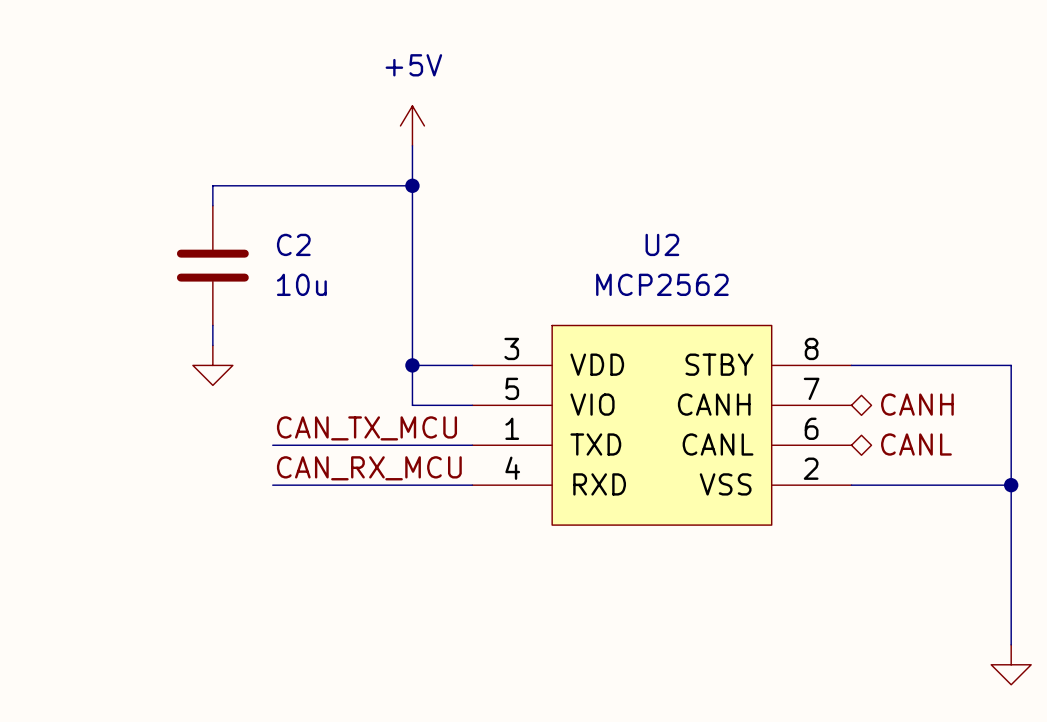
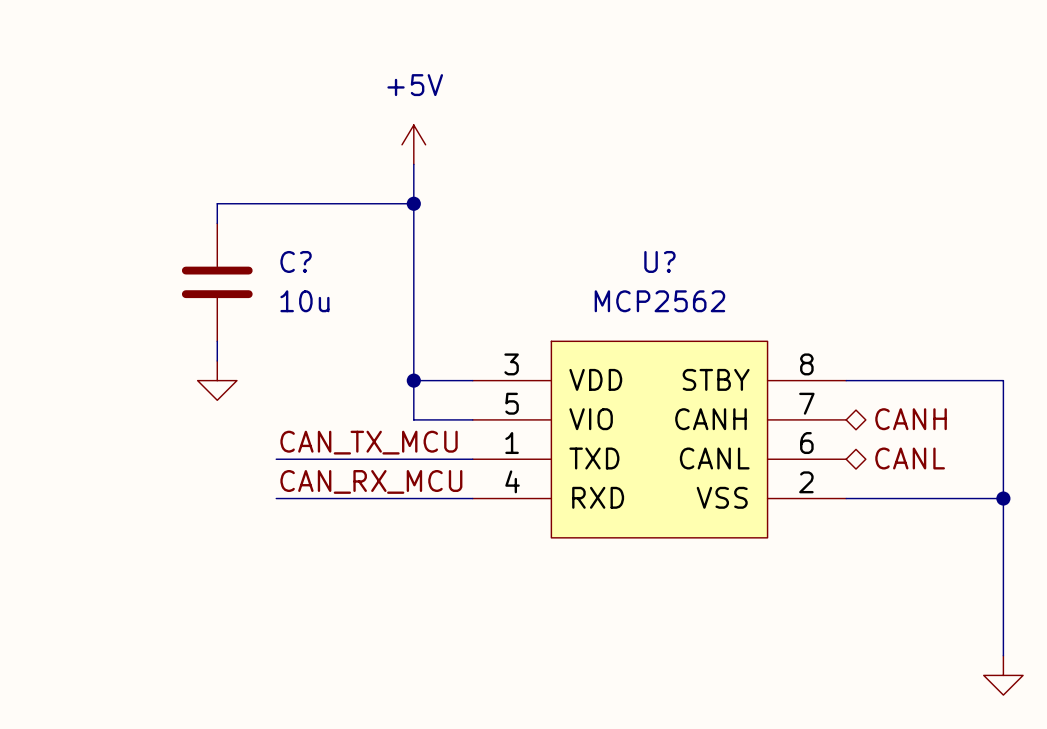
C2 name: C2 (293, 244) -> C? (296, 261)
U2 name: U2 (662, 244) -> U? (659, 261)

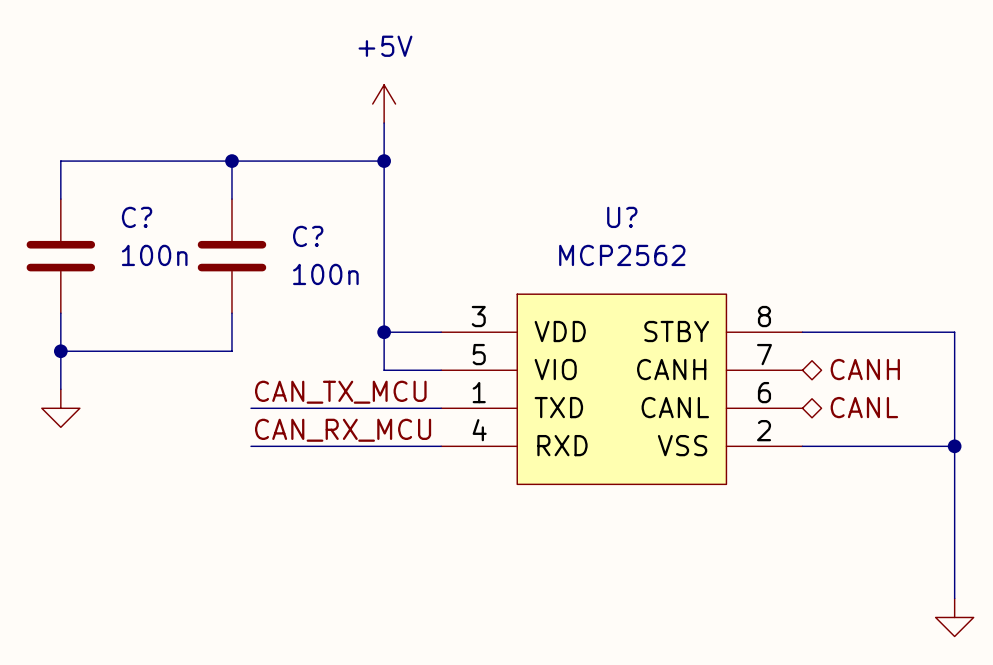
wire: (217, 203) (217, 223) -> (193, 161) (60, 161) (60, 199)
wire: none -> (231, 161) (231, 199)
junction: none -> (231, 161)
C?: 10u (217, 282) -> none
C?: none -> 100n (60, 256)
C?: none -> 100n (231, 256)
wire: (217, 341) (217, 360) -> none
wire: none -> (60, 313) (60, 389)
wire: none -> (231, 313) (231, 351) (60, 351)
power symbol position: (217, 380) -> (60, 408)
junction: none -> (60, 351)

